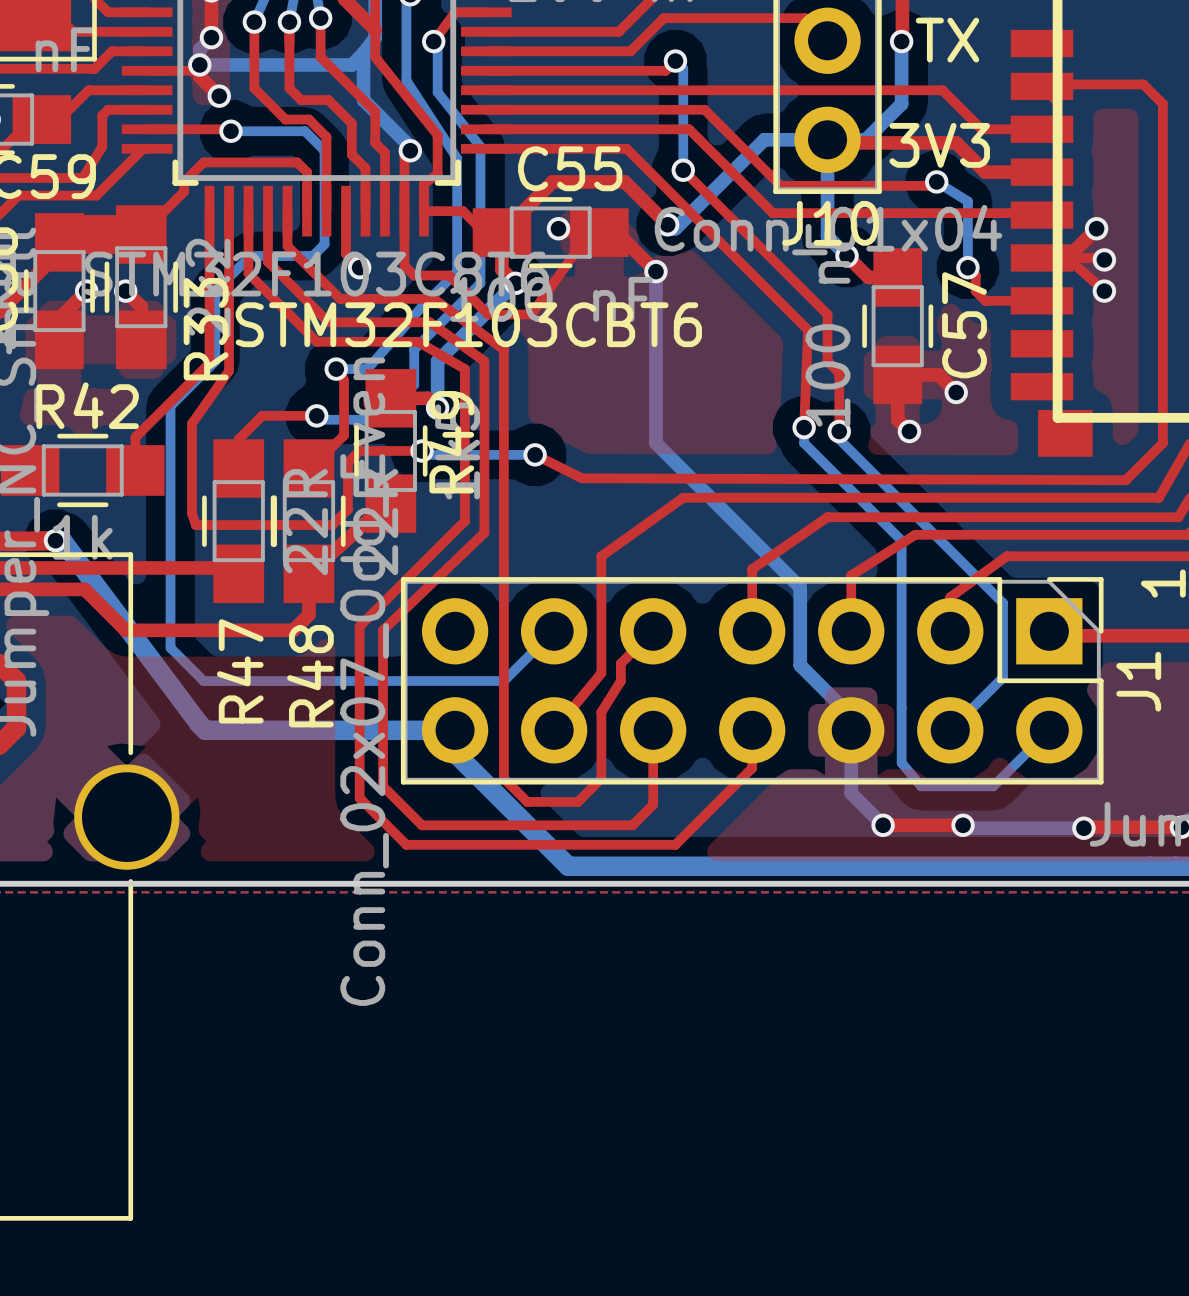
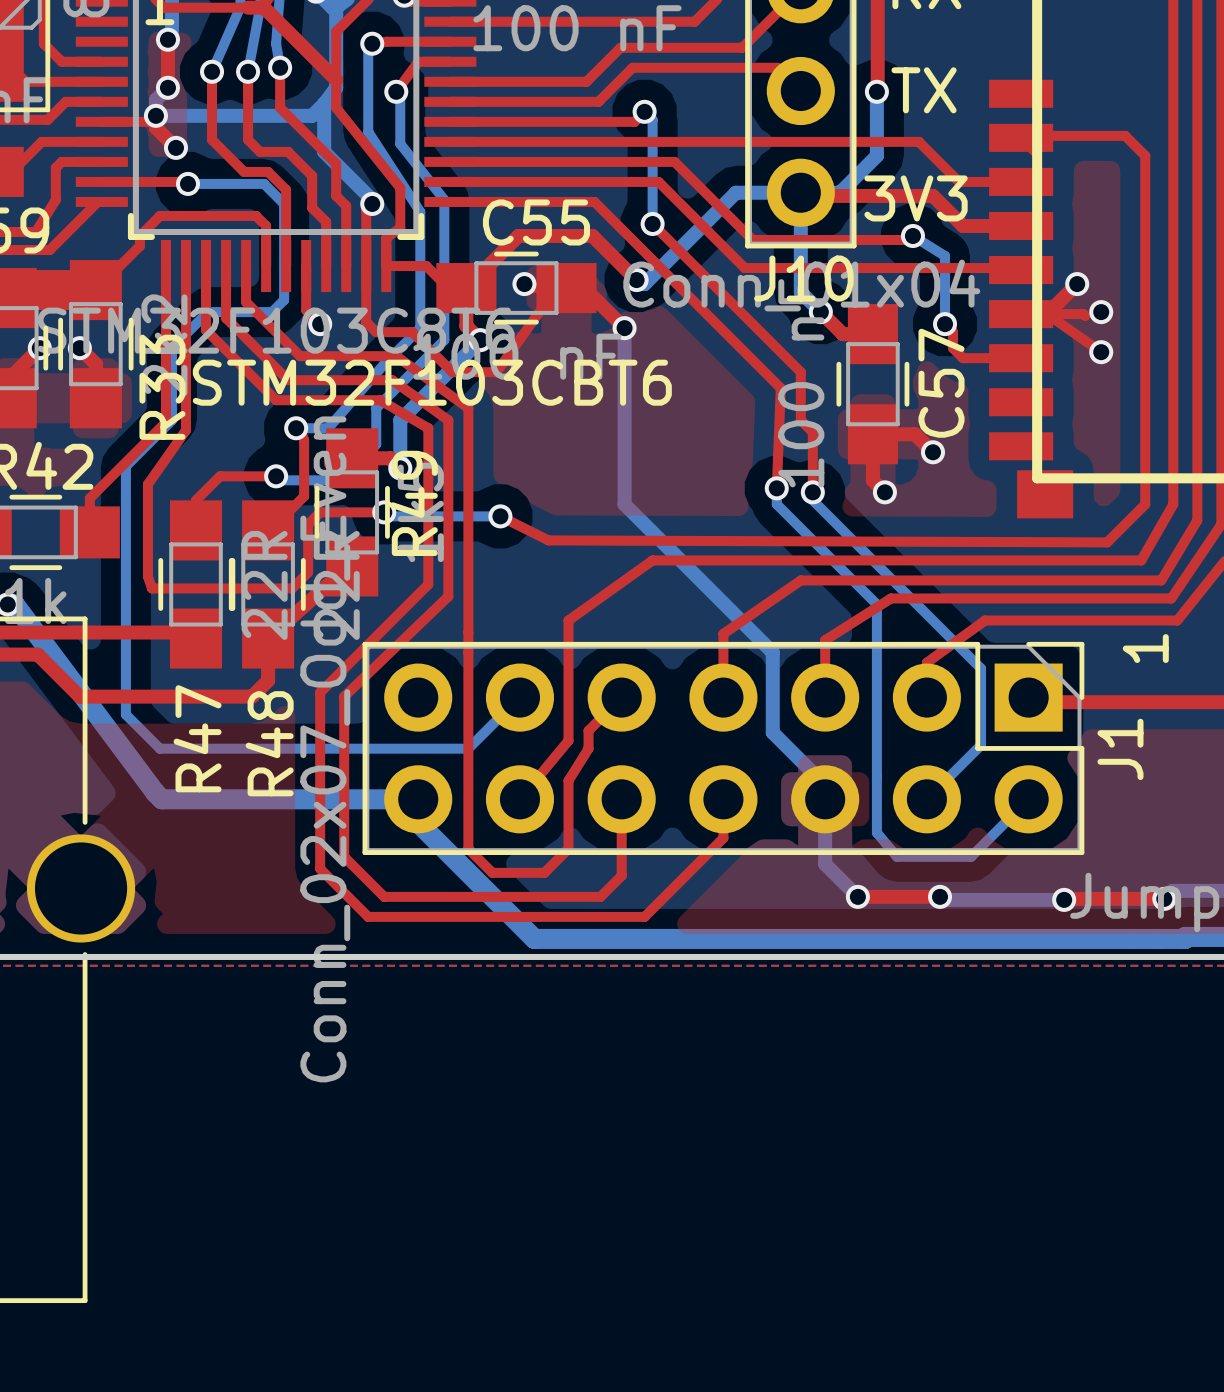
top track: (1067, 257) (1104, 291) -> (1047, 314) (1101, 352)
via position: (1104, 259) -> (1101, 312)
via position: (1104, 291) -> (1101, 352)

